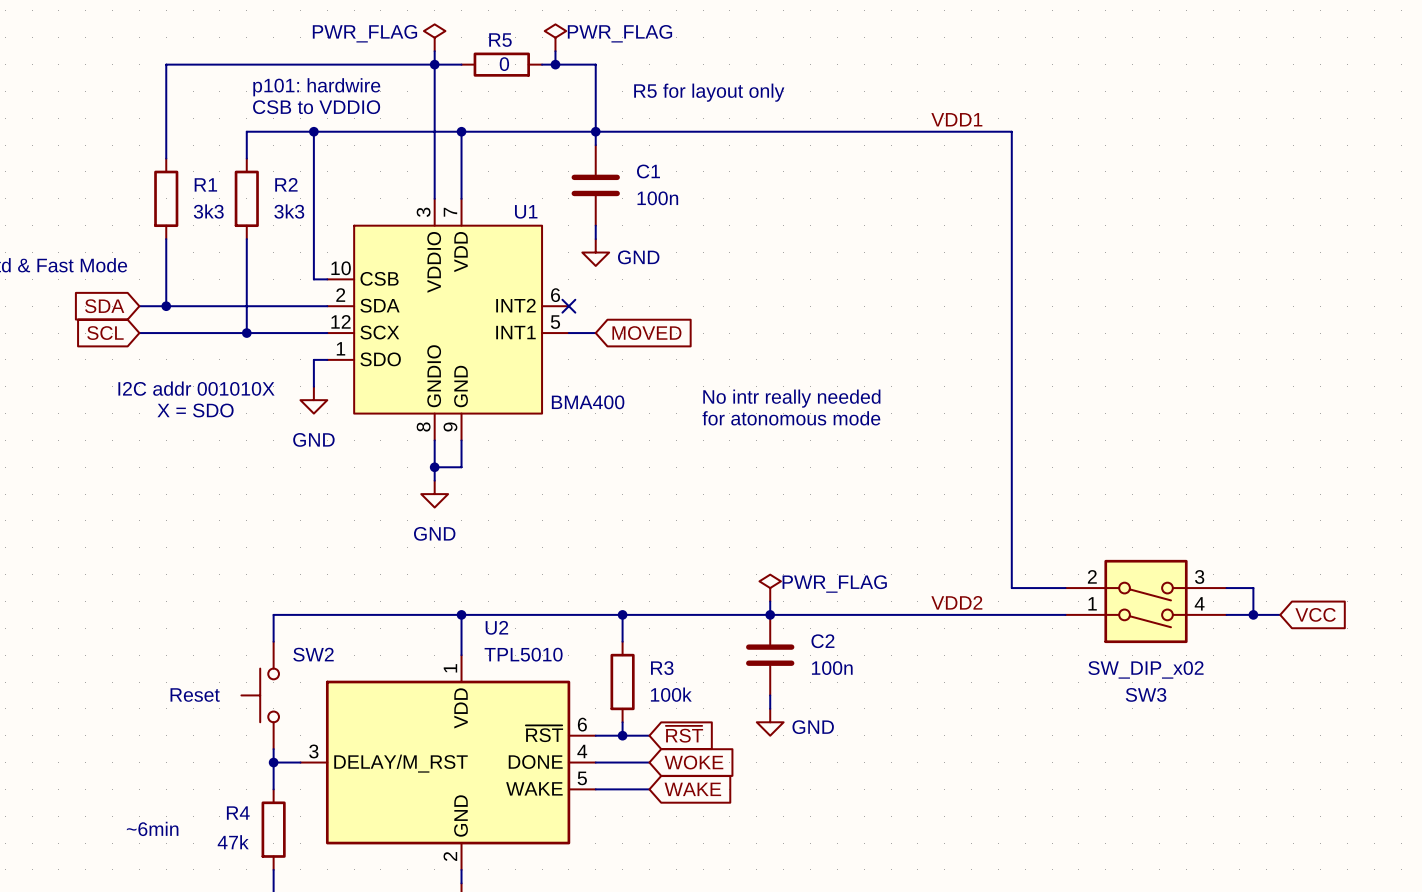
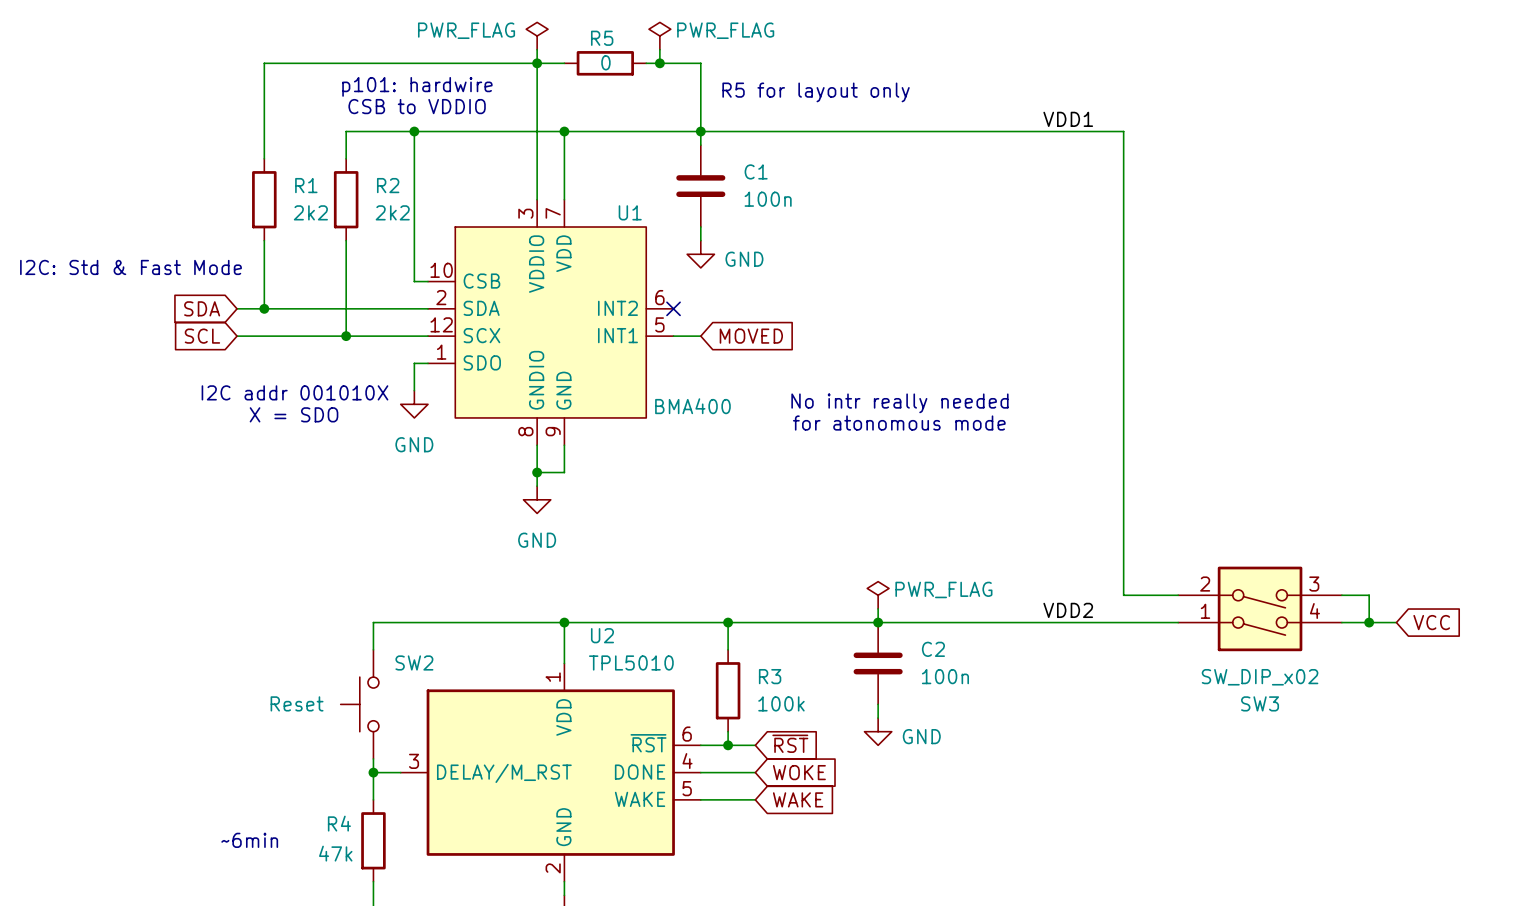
R1 value: 3k3 (208, 211) -> 2k2 (310, 212)
R2 value: 3k3 (289, 211) -> 2k2 (392, 212)

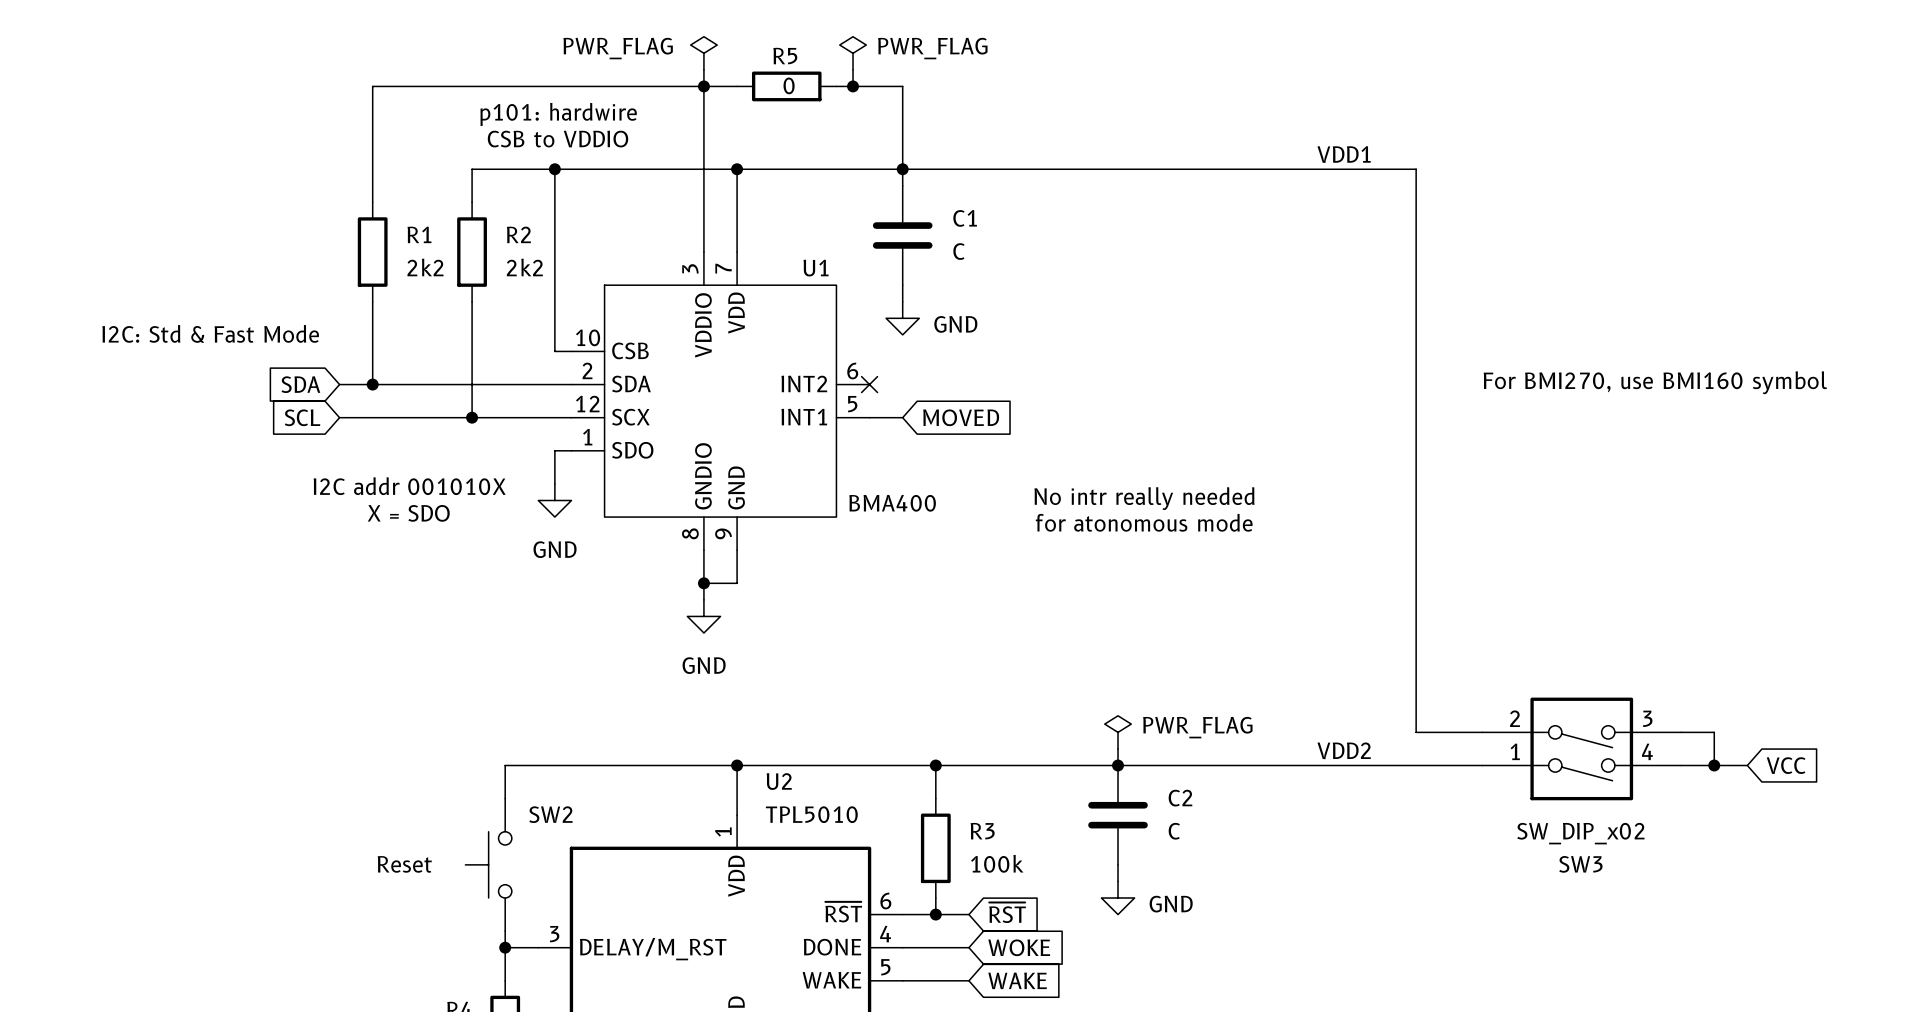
text: R5 for layout only (816, 92) -> none
C1 value: 100n (768, 199) -> C (958, 251)
text: none -> For BMI270, use BMI160 symbol (1655, 382)
C2 value: 100n (945, 676) -> C (1174, 831)

